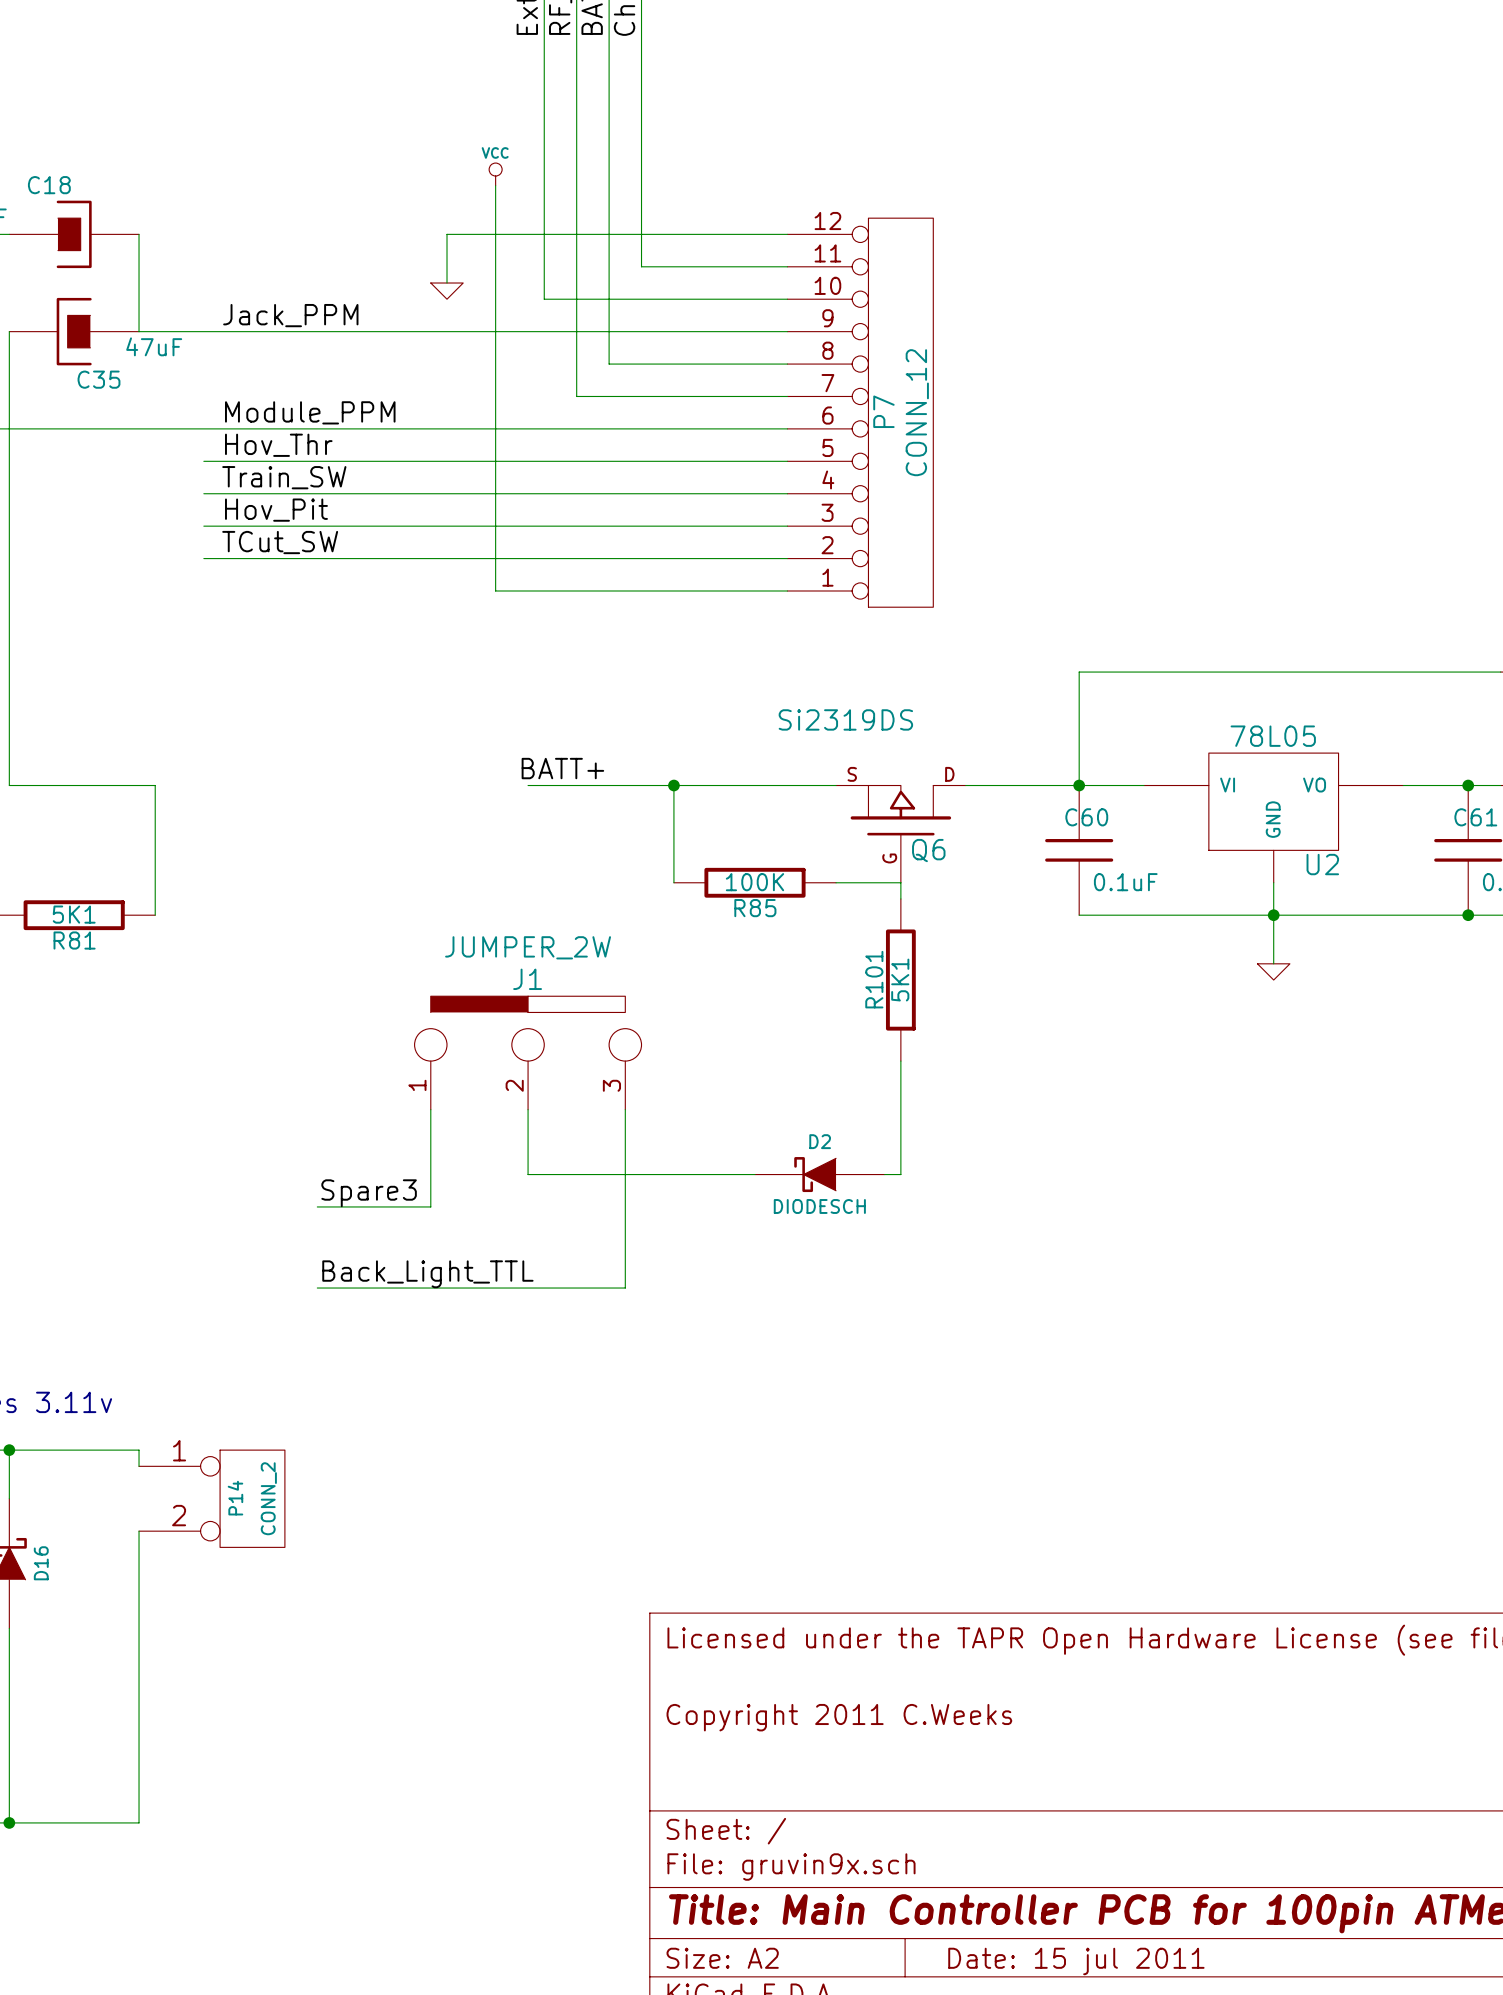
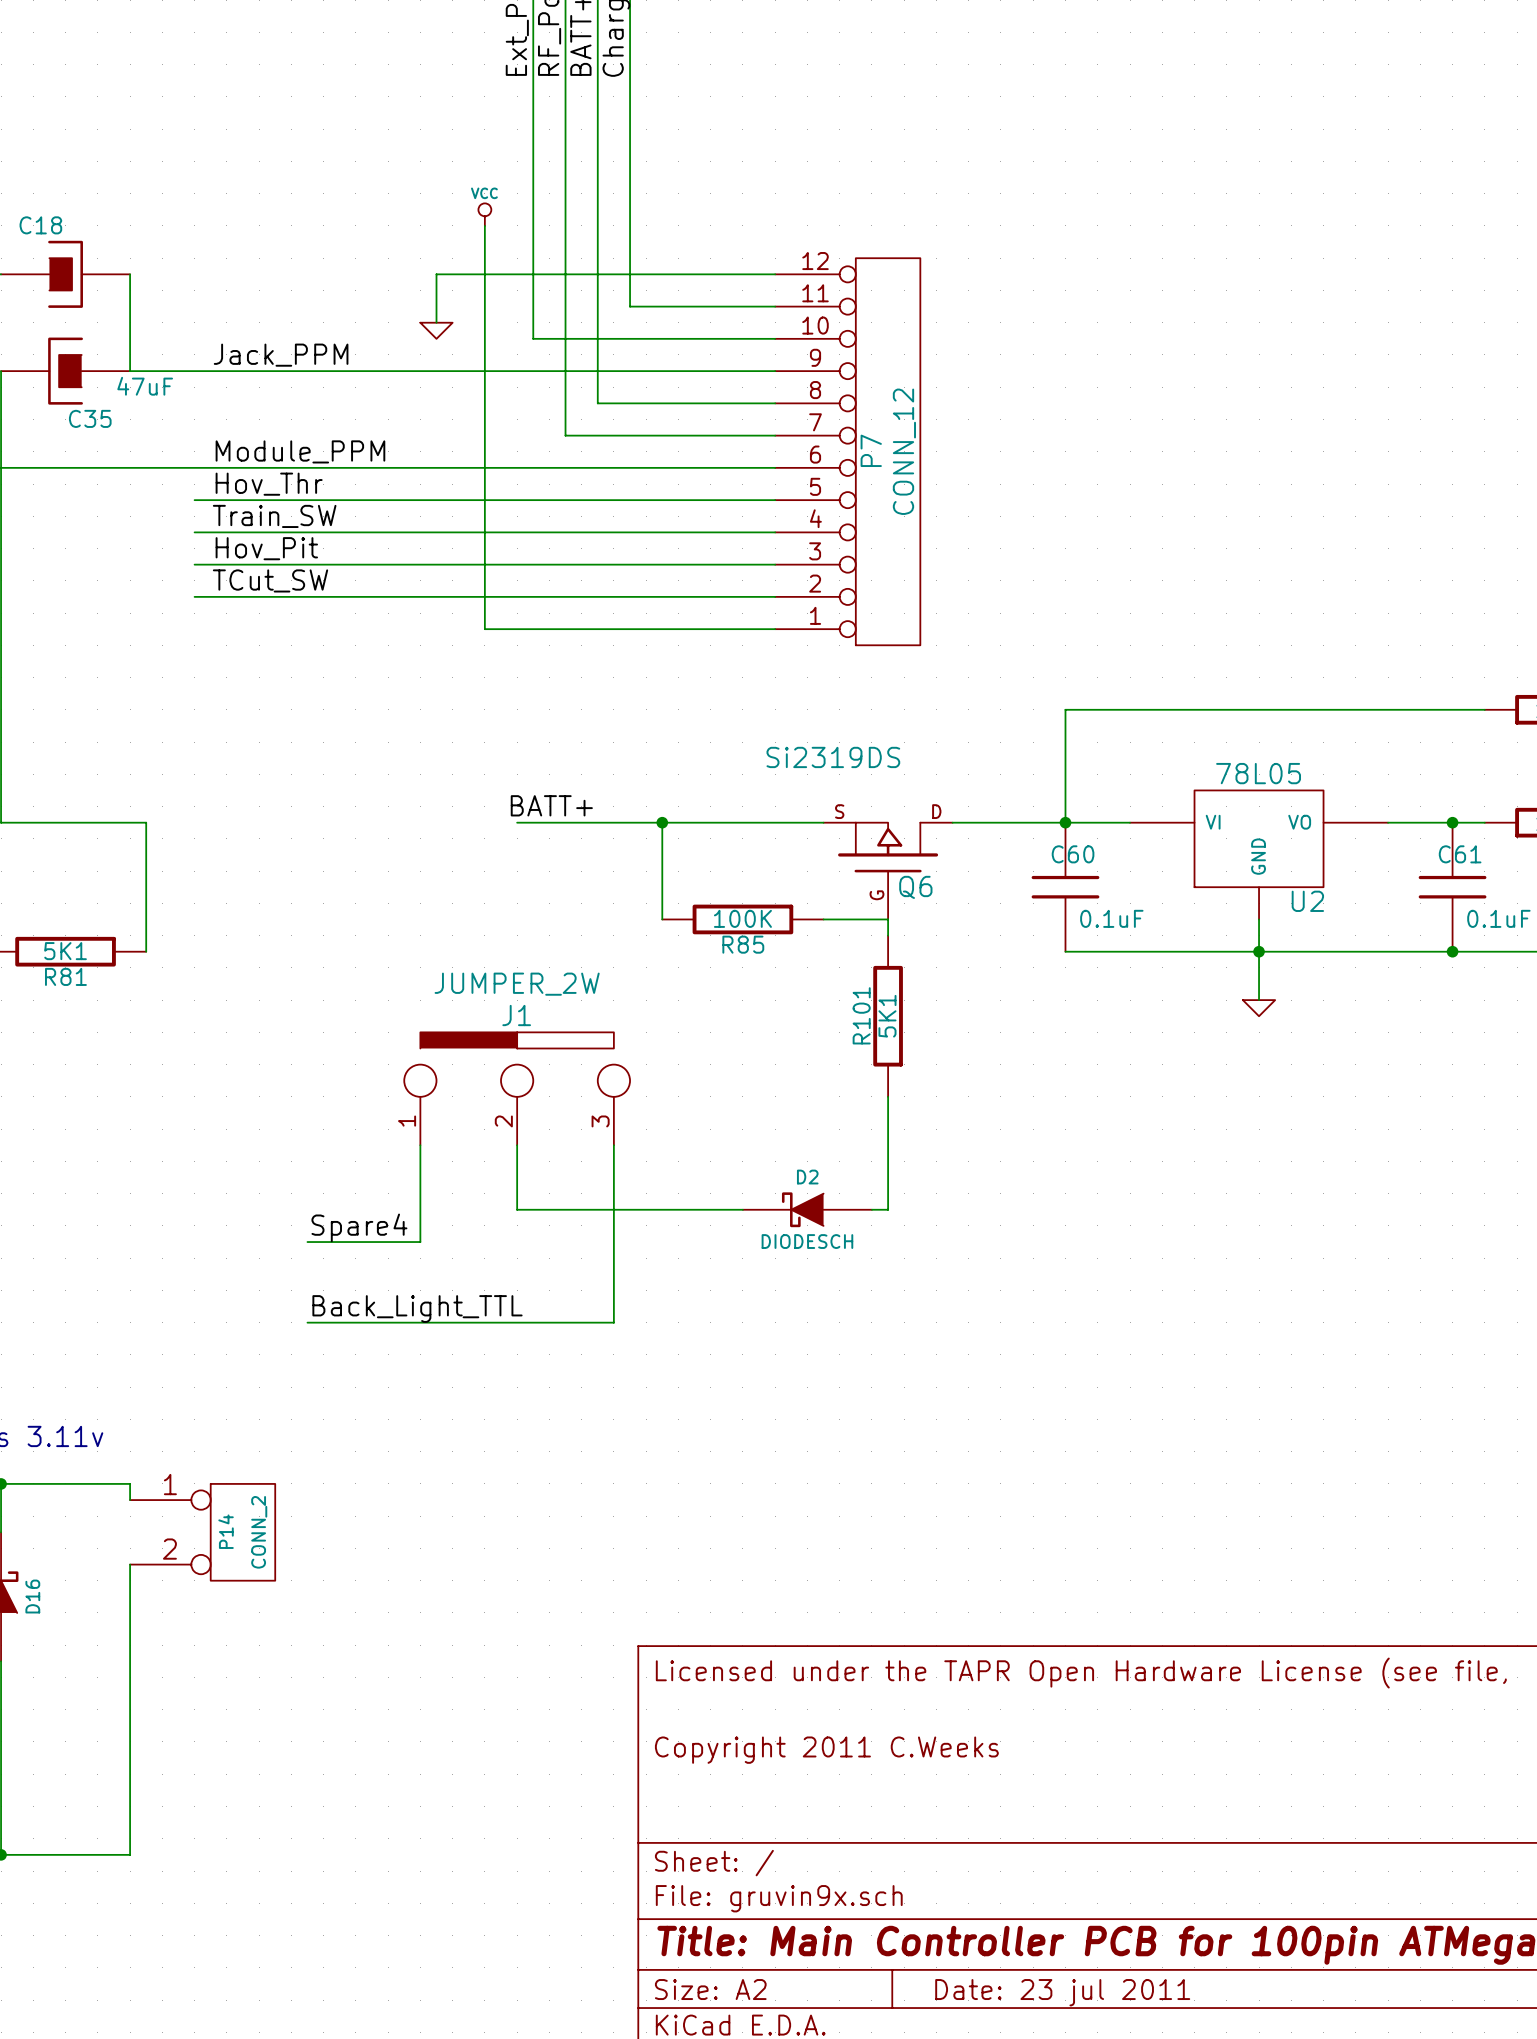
label: Spare3 (369, 1193) -> Spare4 (359, 1227)
title block: Date: 15 jul 2011 (1076, 1961) -> Date: 23 jul 2011 (1062, 1992)

